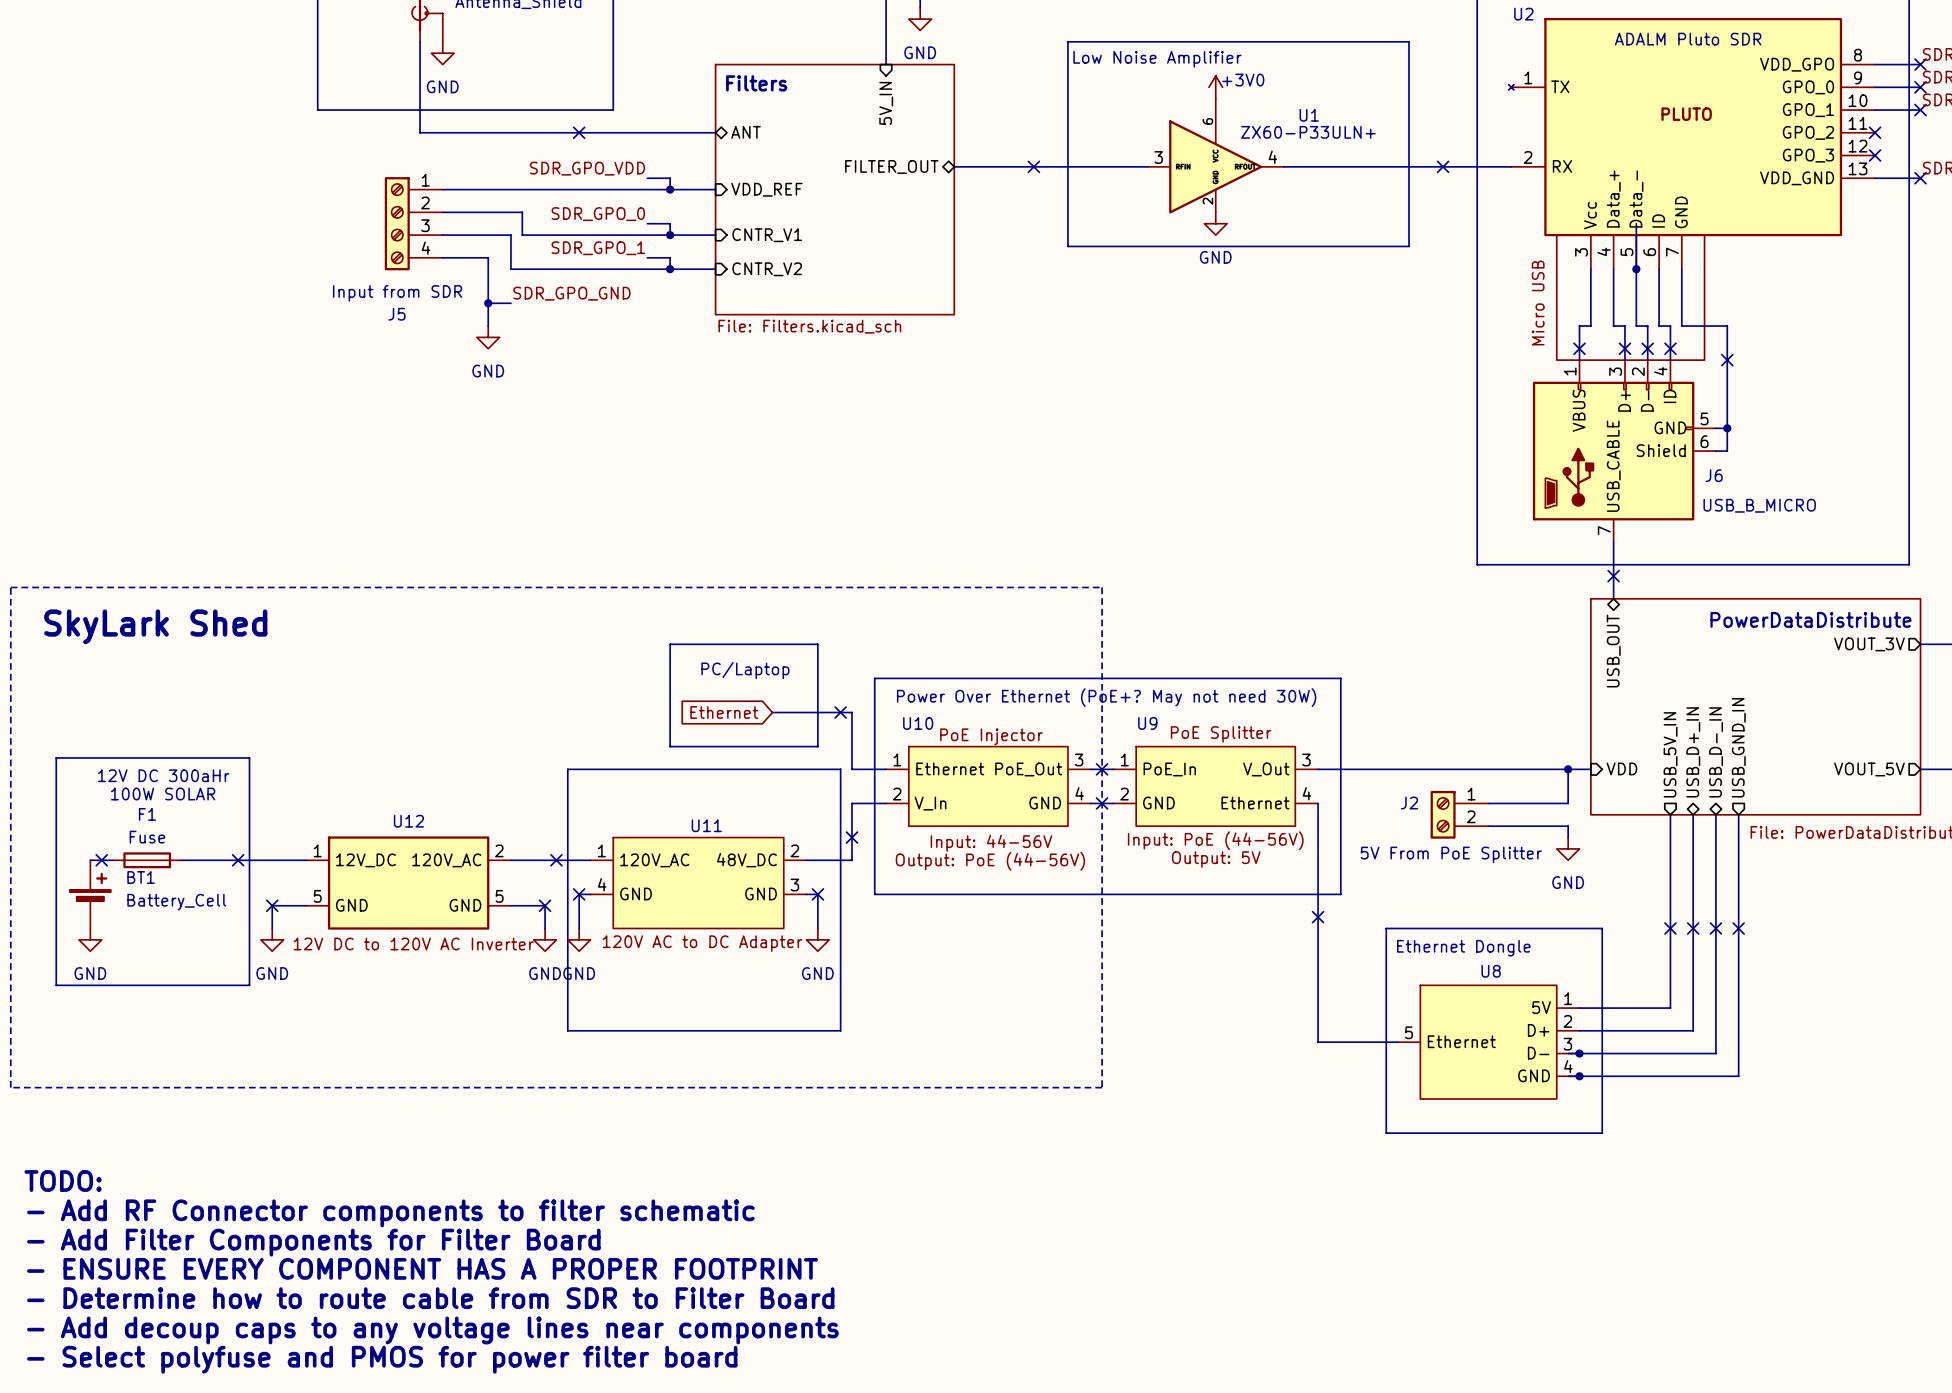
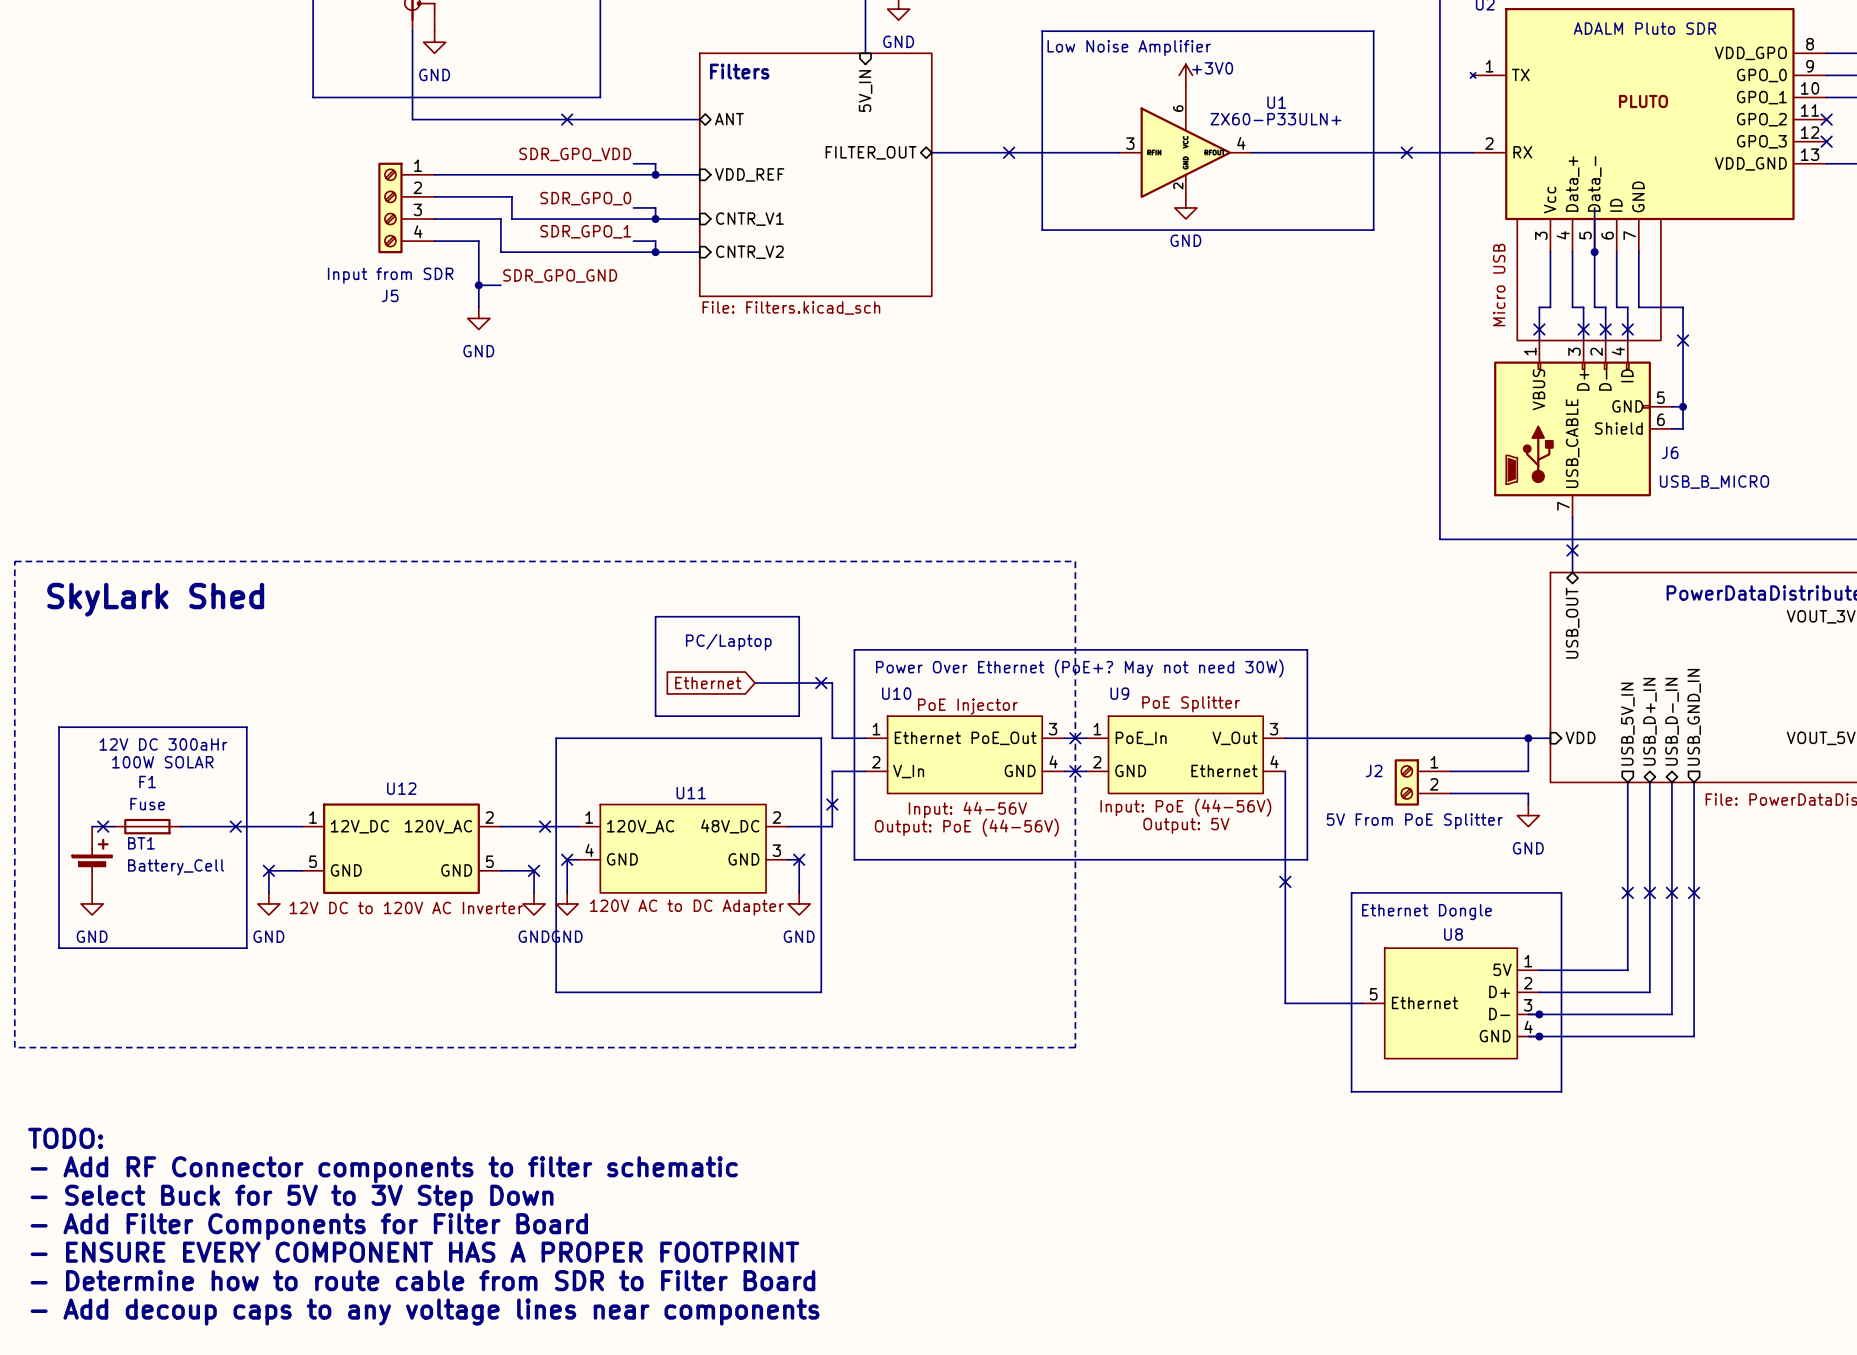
text: - Add Filter Components for Filter Board (313, 1242) -> - Select Buck for 5V to 3V Step Down (292, 1198)
text: - ENSURE EVERY COMPONENT HAS A PROPER FOOTPRINT (422, 1268) -> - Add Filter Components for Filter Board (309, 1226)
text: - Determine how to route cable from SDR to Filter Board (430, 1298) -> - ENSURE EVERY COMPONENT HAS A PROPER FOOTPRINT (414, 1252)
text: - Add decoup caps to any voltage lines near components (432, 1330) -> - Determine how to route cable from SDR to Filter Board (422, 1280)
text: - Select polyfuse and PMOS for power filter board (382, 1359) -> - Add decoup caps to any voltage lines near components (425, 1312)

